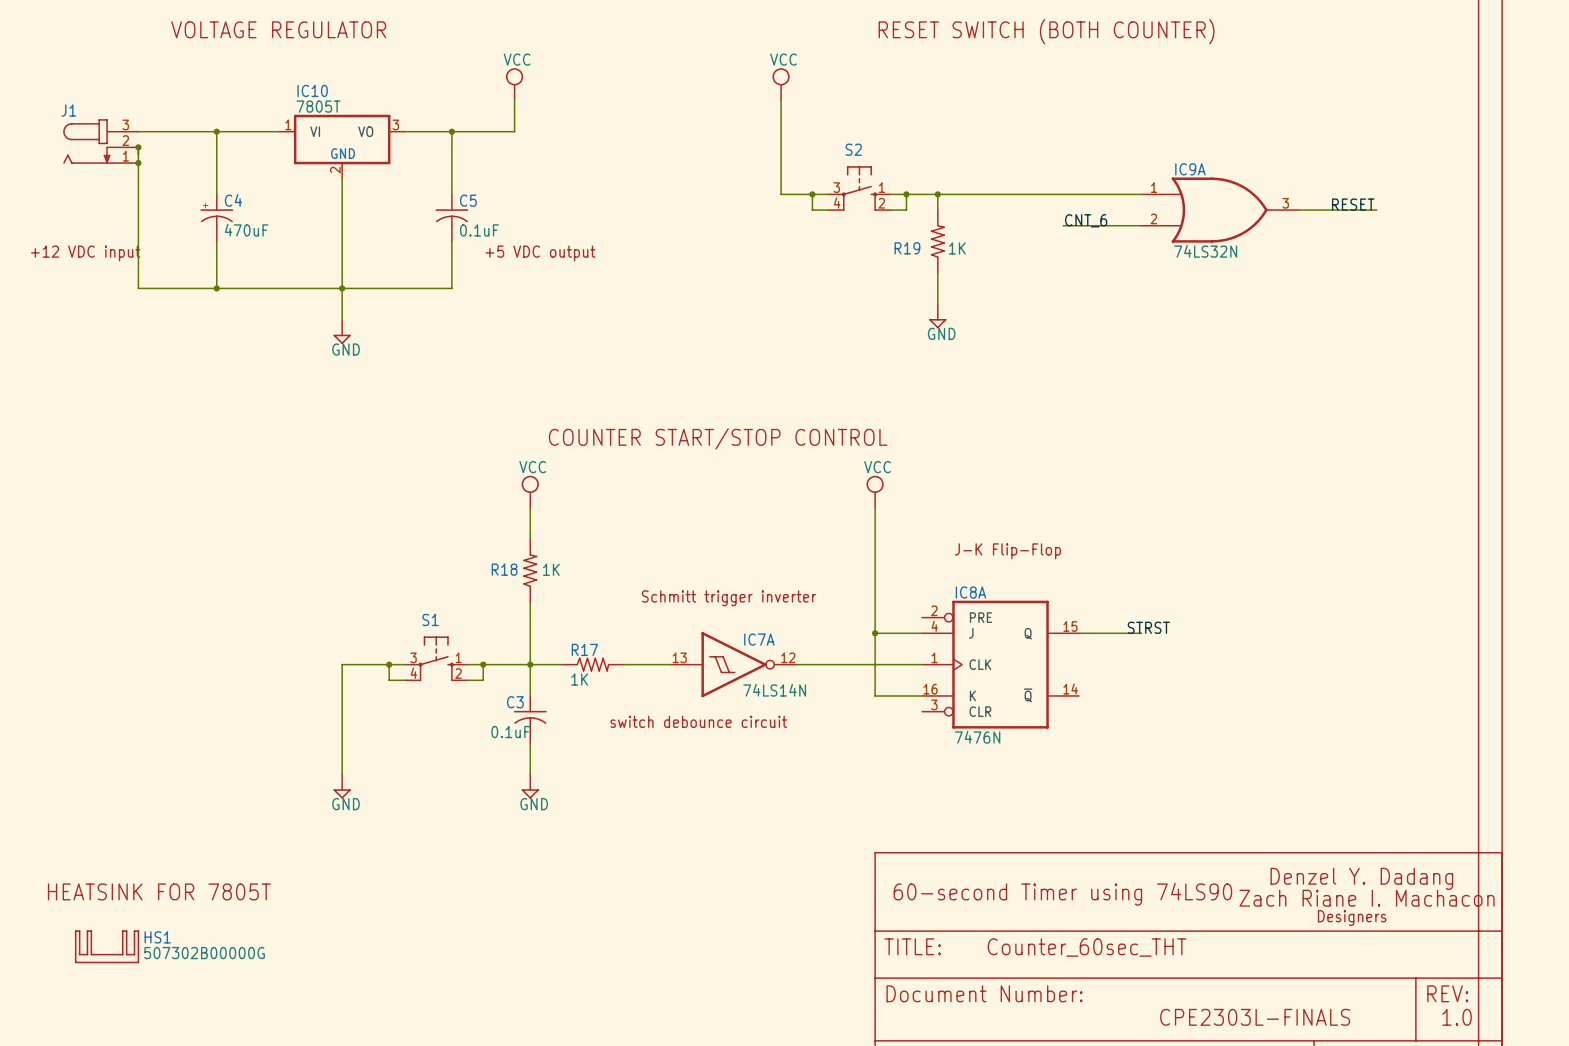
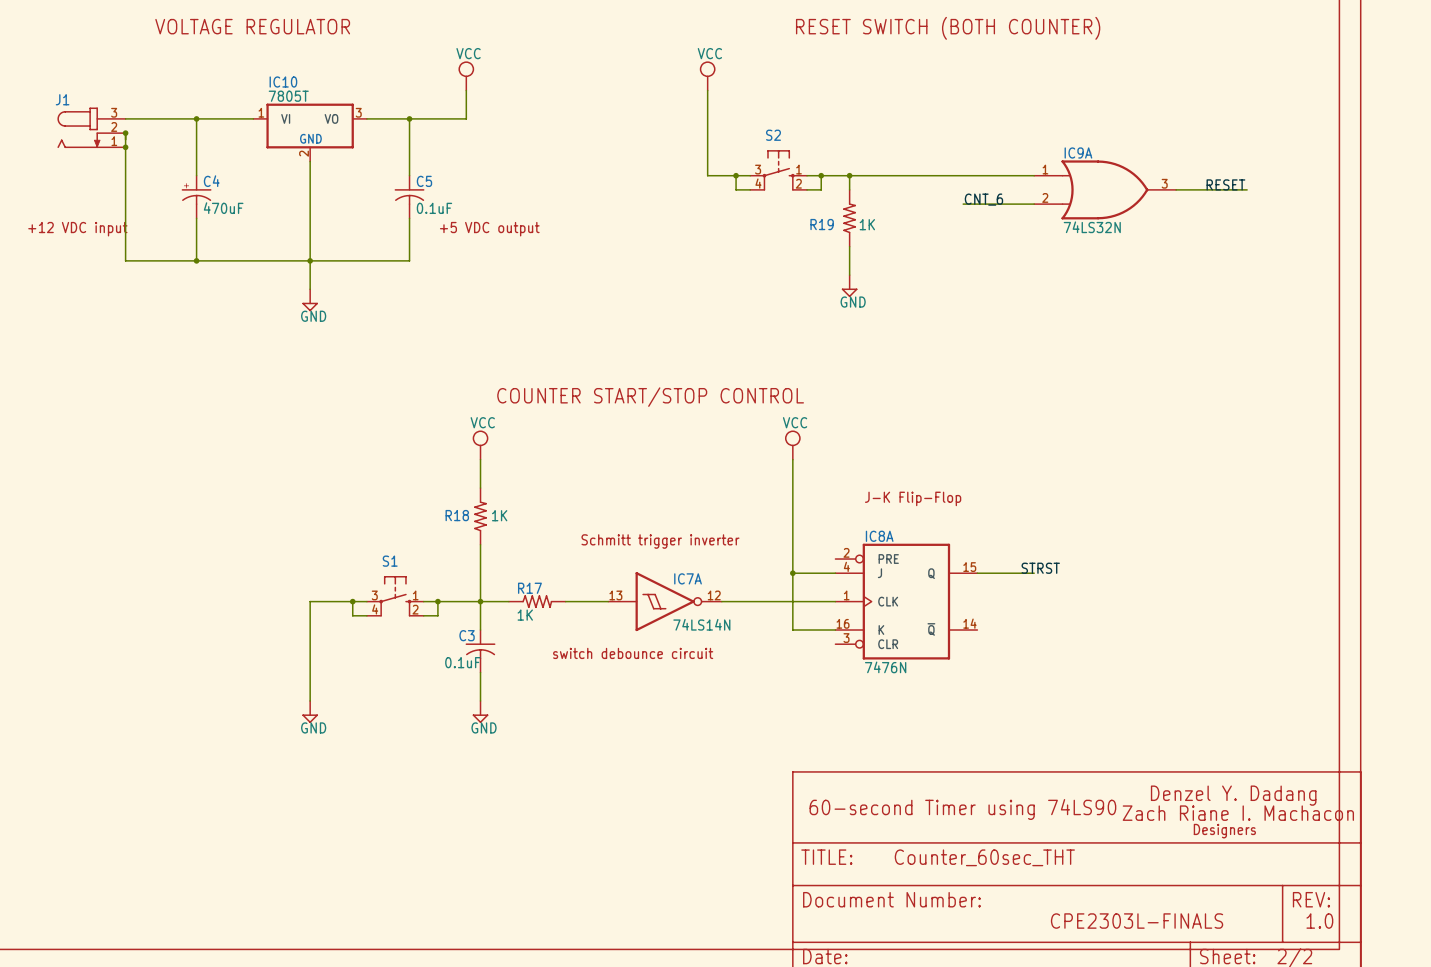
text: HEATSINK FOR 7805T (159, 891) -> none
HS1: 507302B00000G (107, 946) -> none

